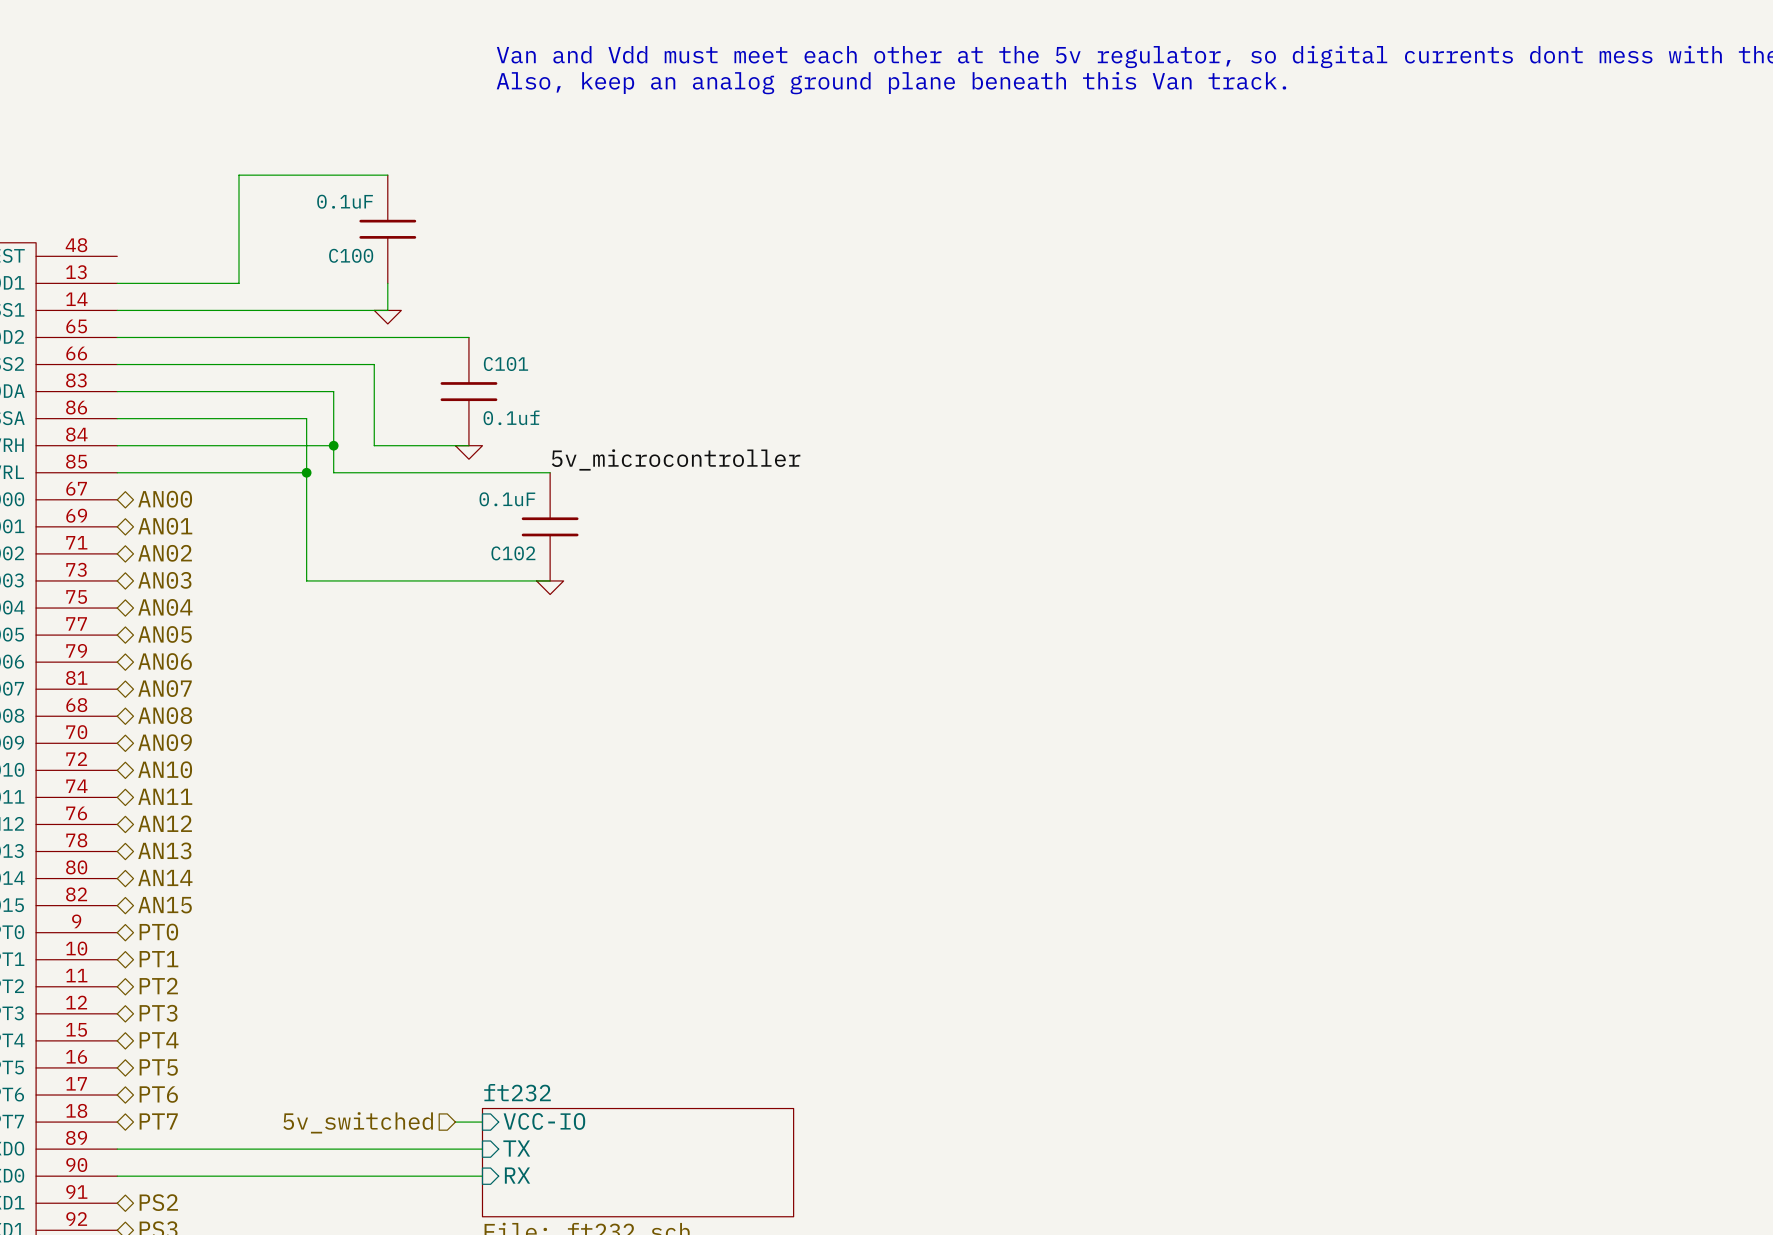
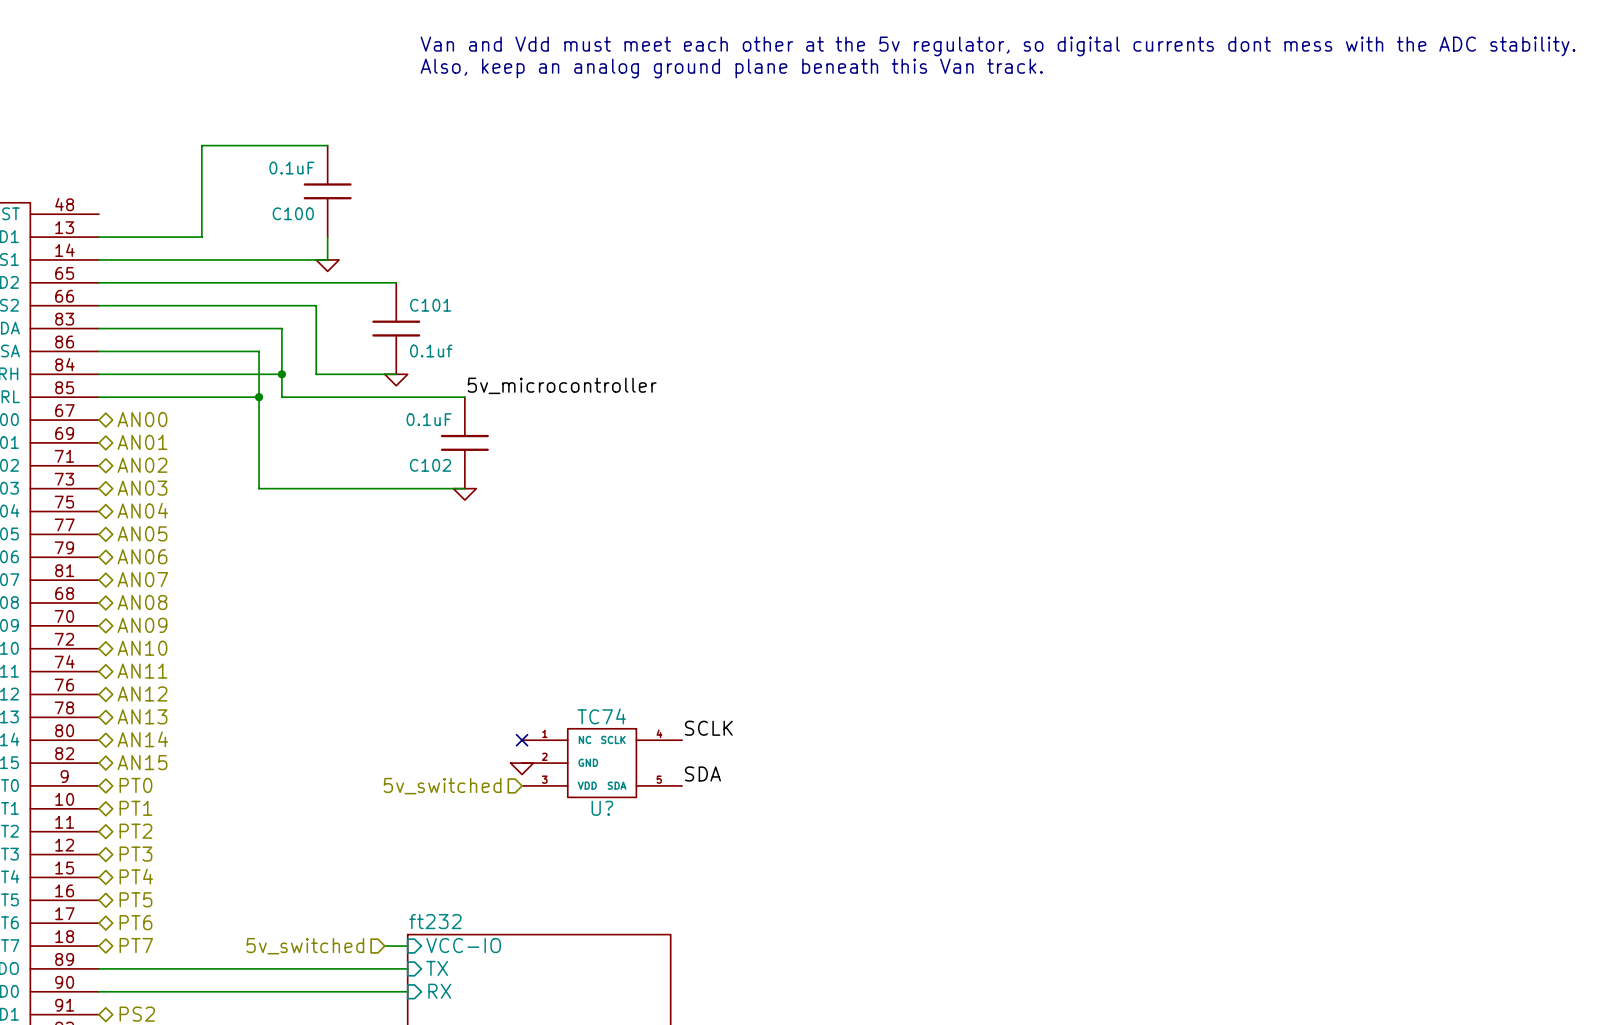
label: none -> SCLK (708, 728)
no-connect mark: none -> (522, 740)
U?: none -> TC74 (602, 763)
power symbol: none -> (522, 768)
label: none -> SDA (702, 773)
hierarchical label: none -> 5v_switched (442, 786)

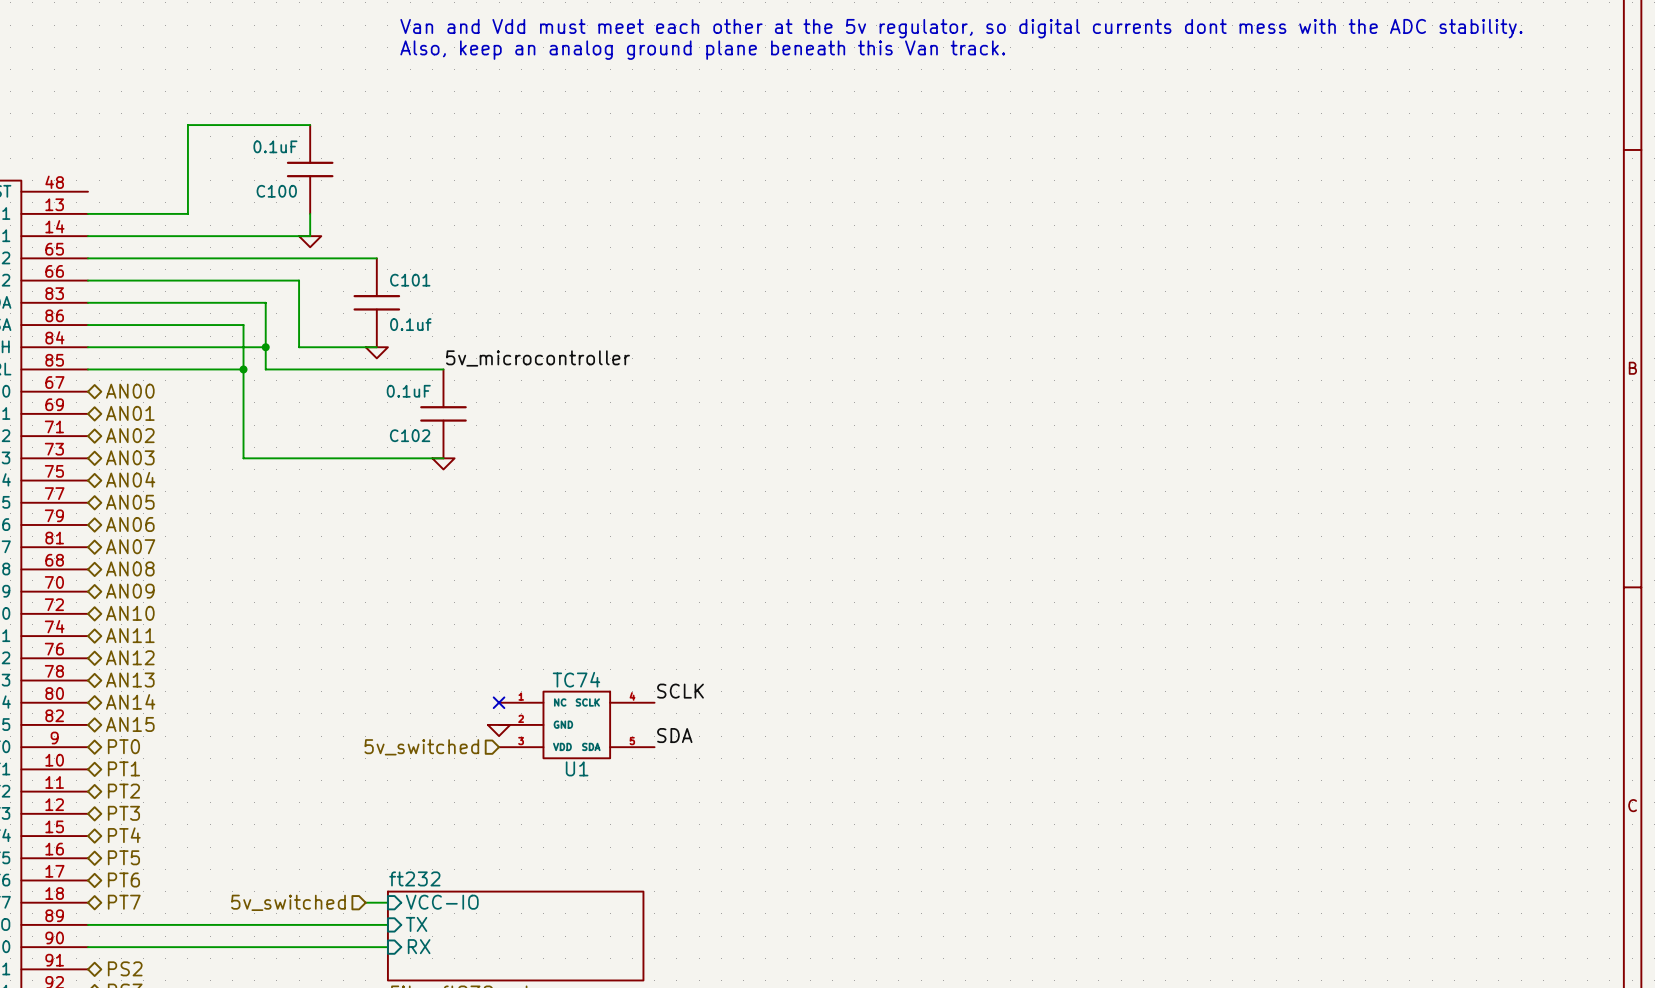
U? name: U? (602, 808) -> U1 (577, 768)

